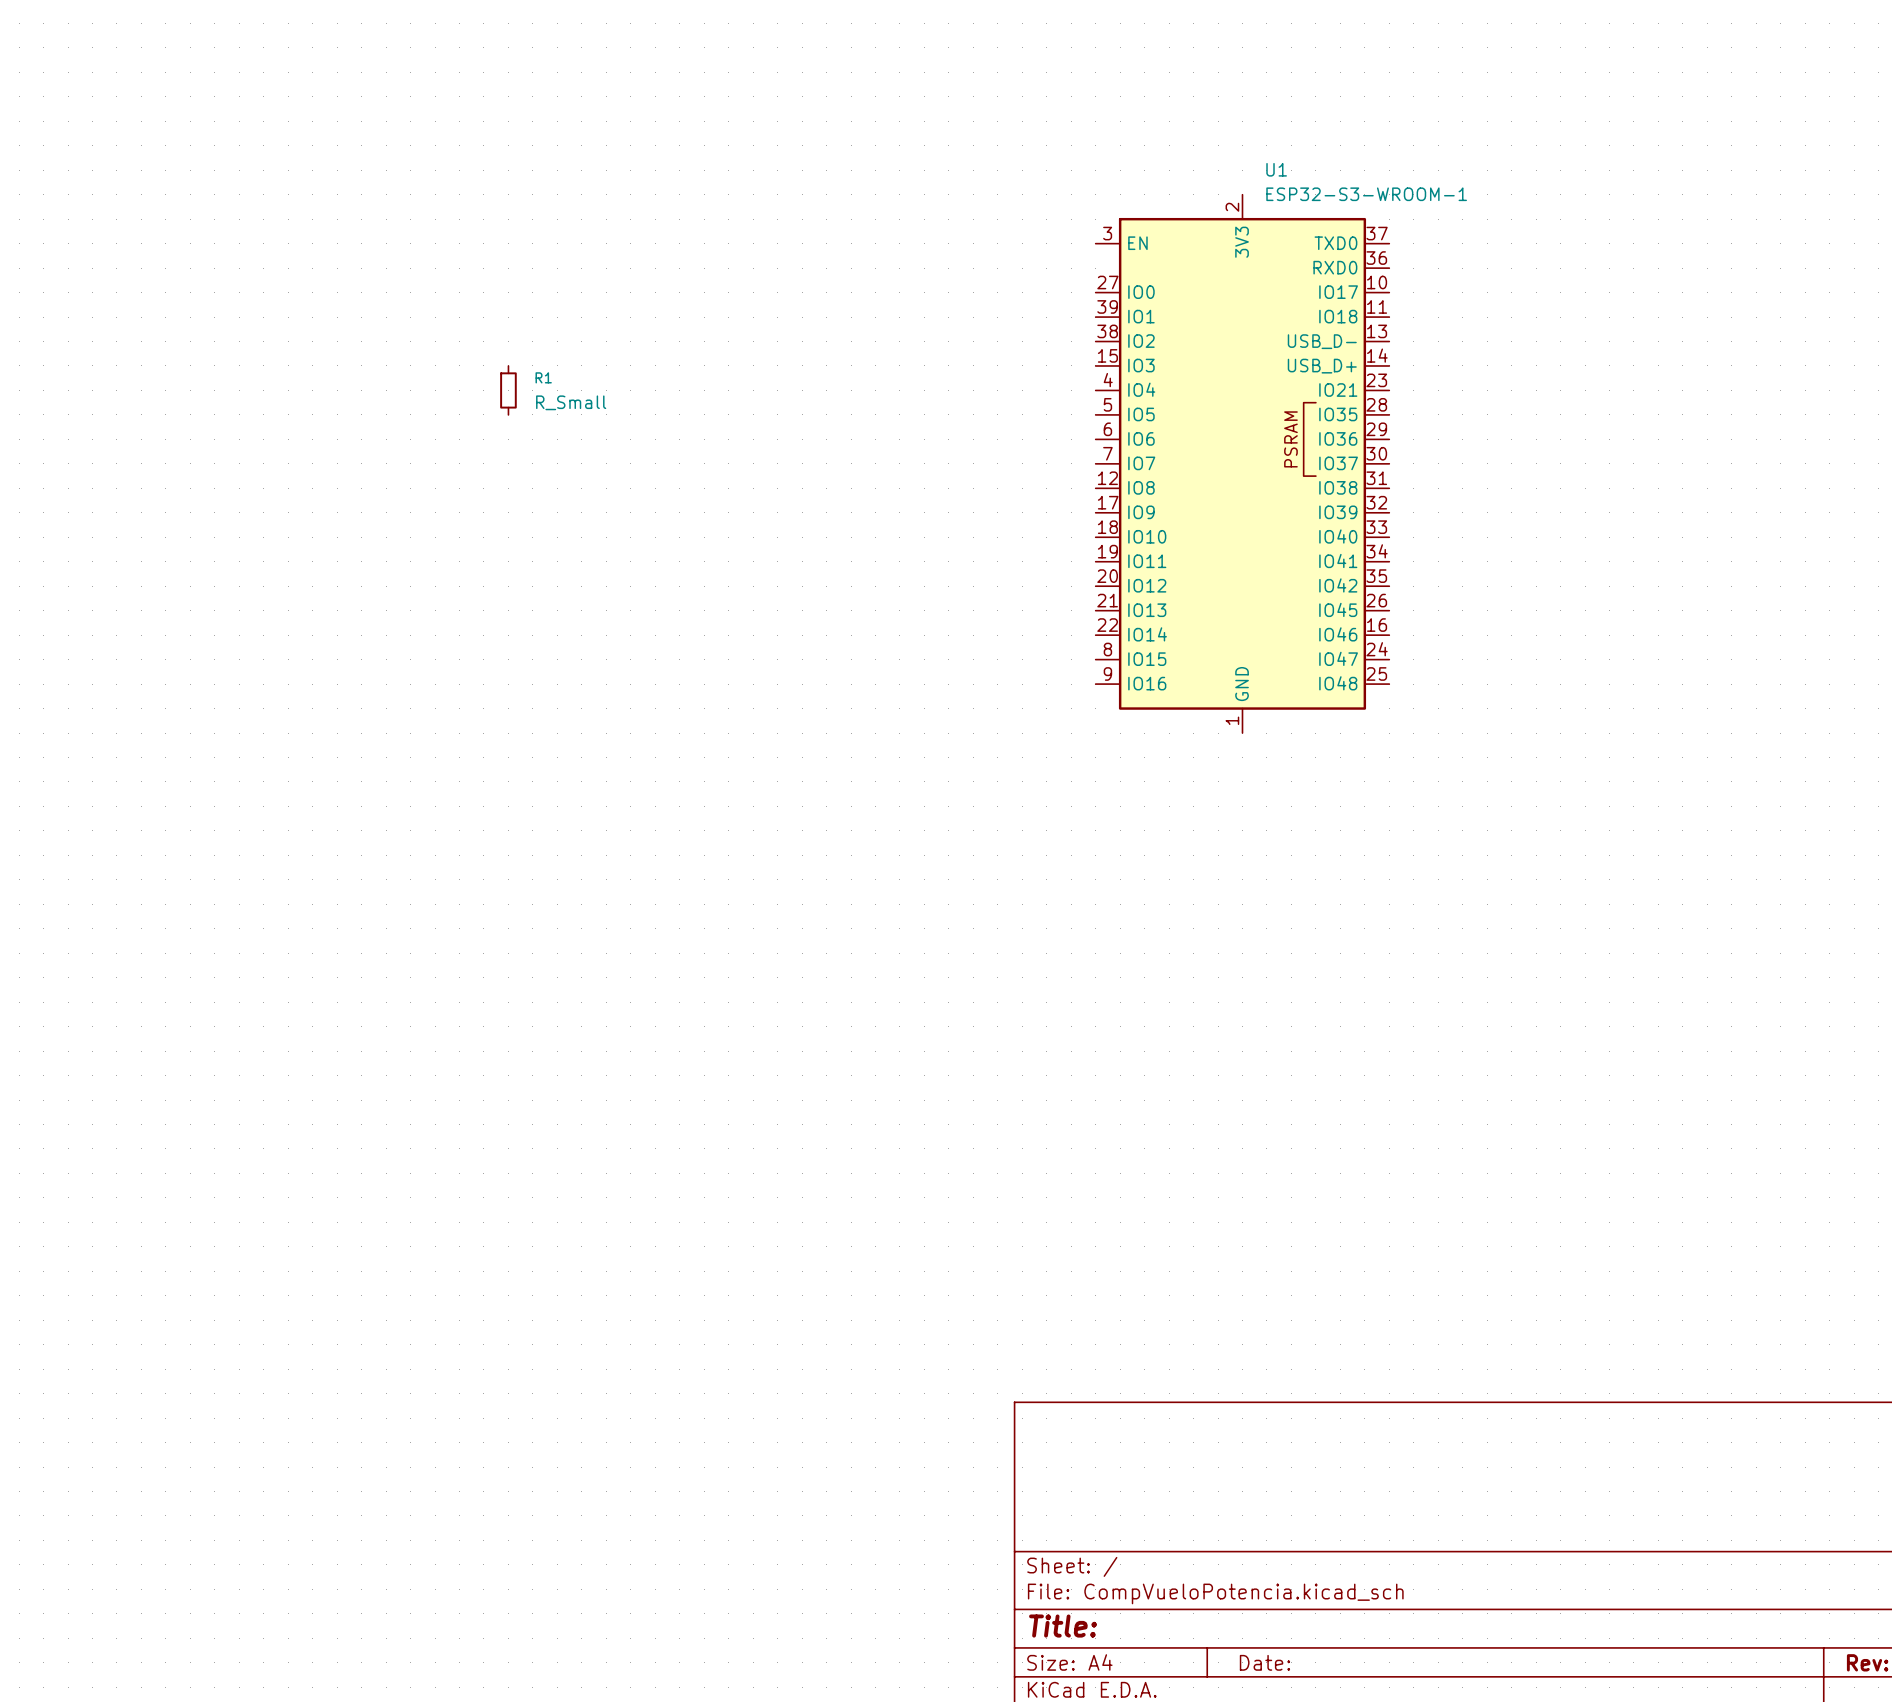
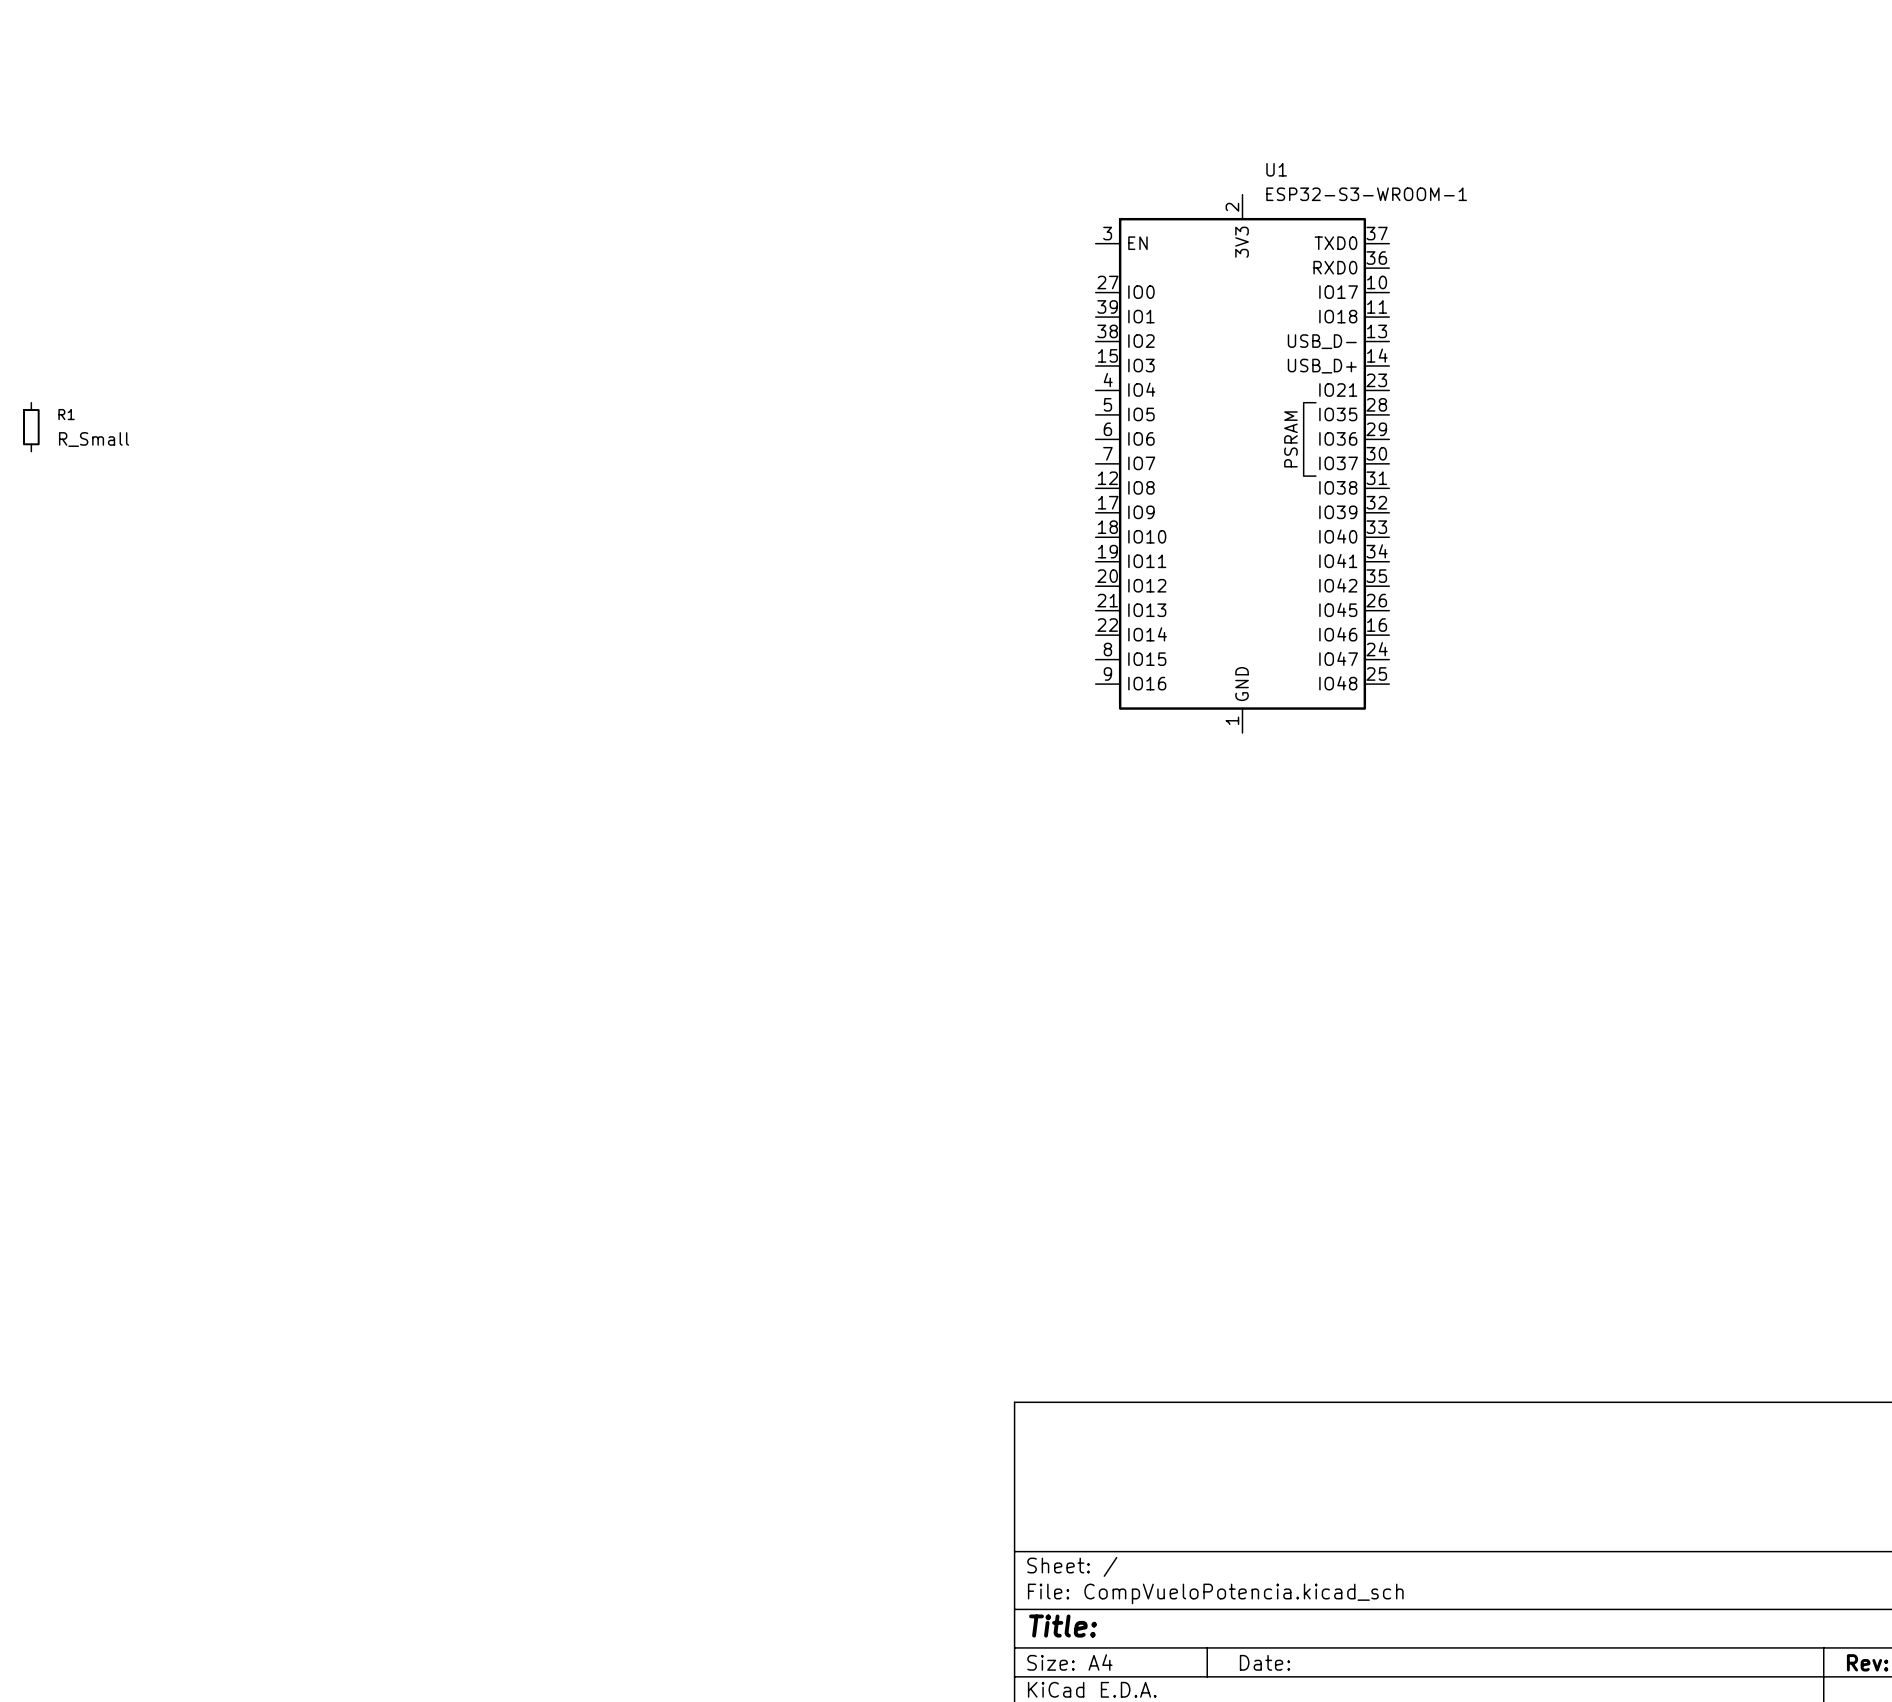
R1 position: (508, 390) -> (31, 427)

